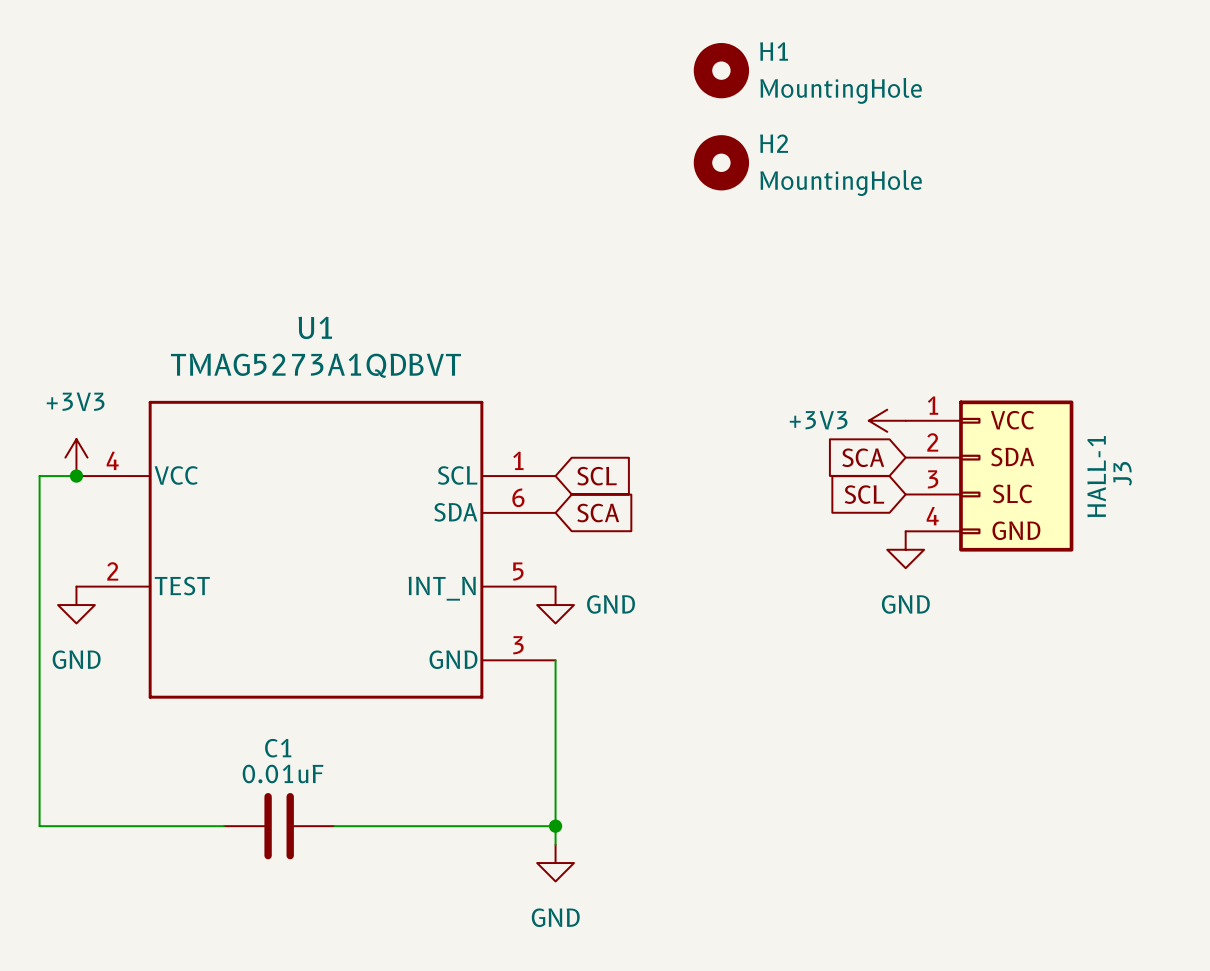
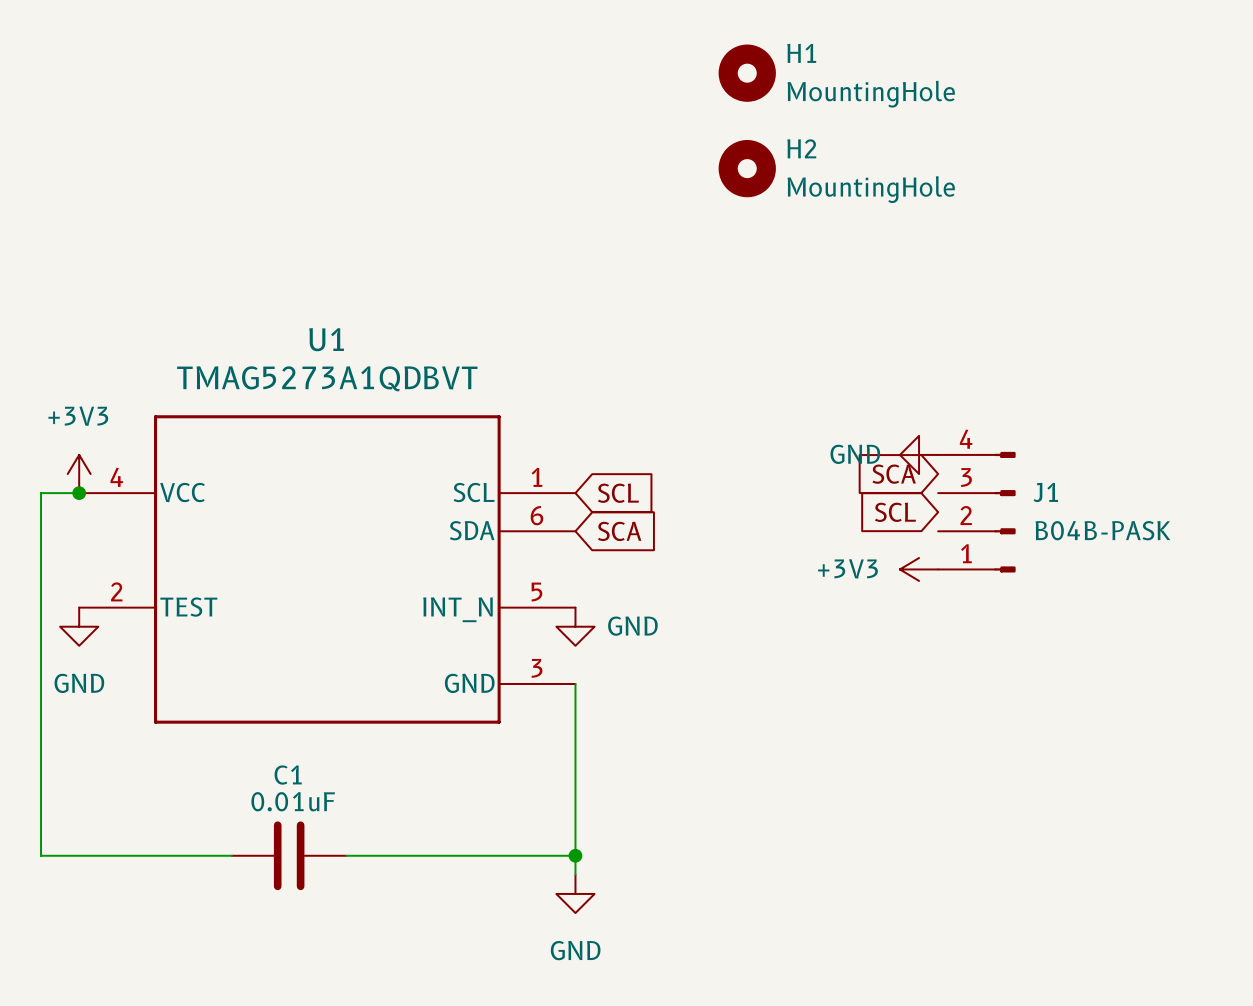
power symbol position: +3V3 (887, 420) -> +3V3 (919, 569)
J3: HALL-1 (989, 476) -> none
J1: none -> B04B-PASK (976, 512)
power symbol rotation: 0° (905, 549) -> 90° clockwise (919, 454)
power symbol position: GND (905, 549) -> GND (919, 454)

